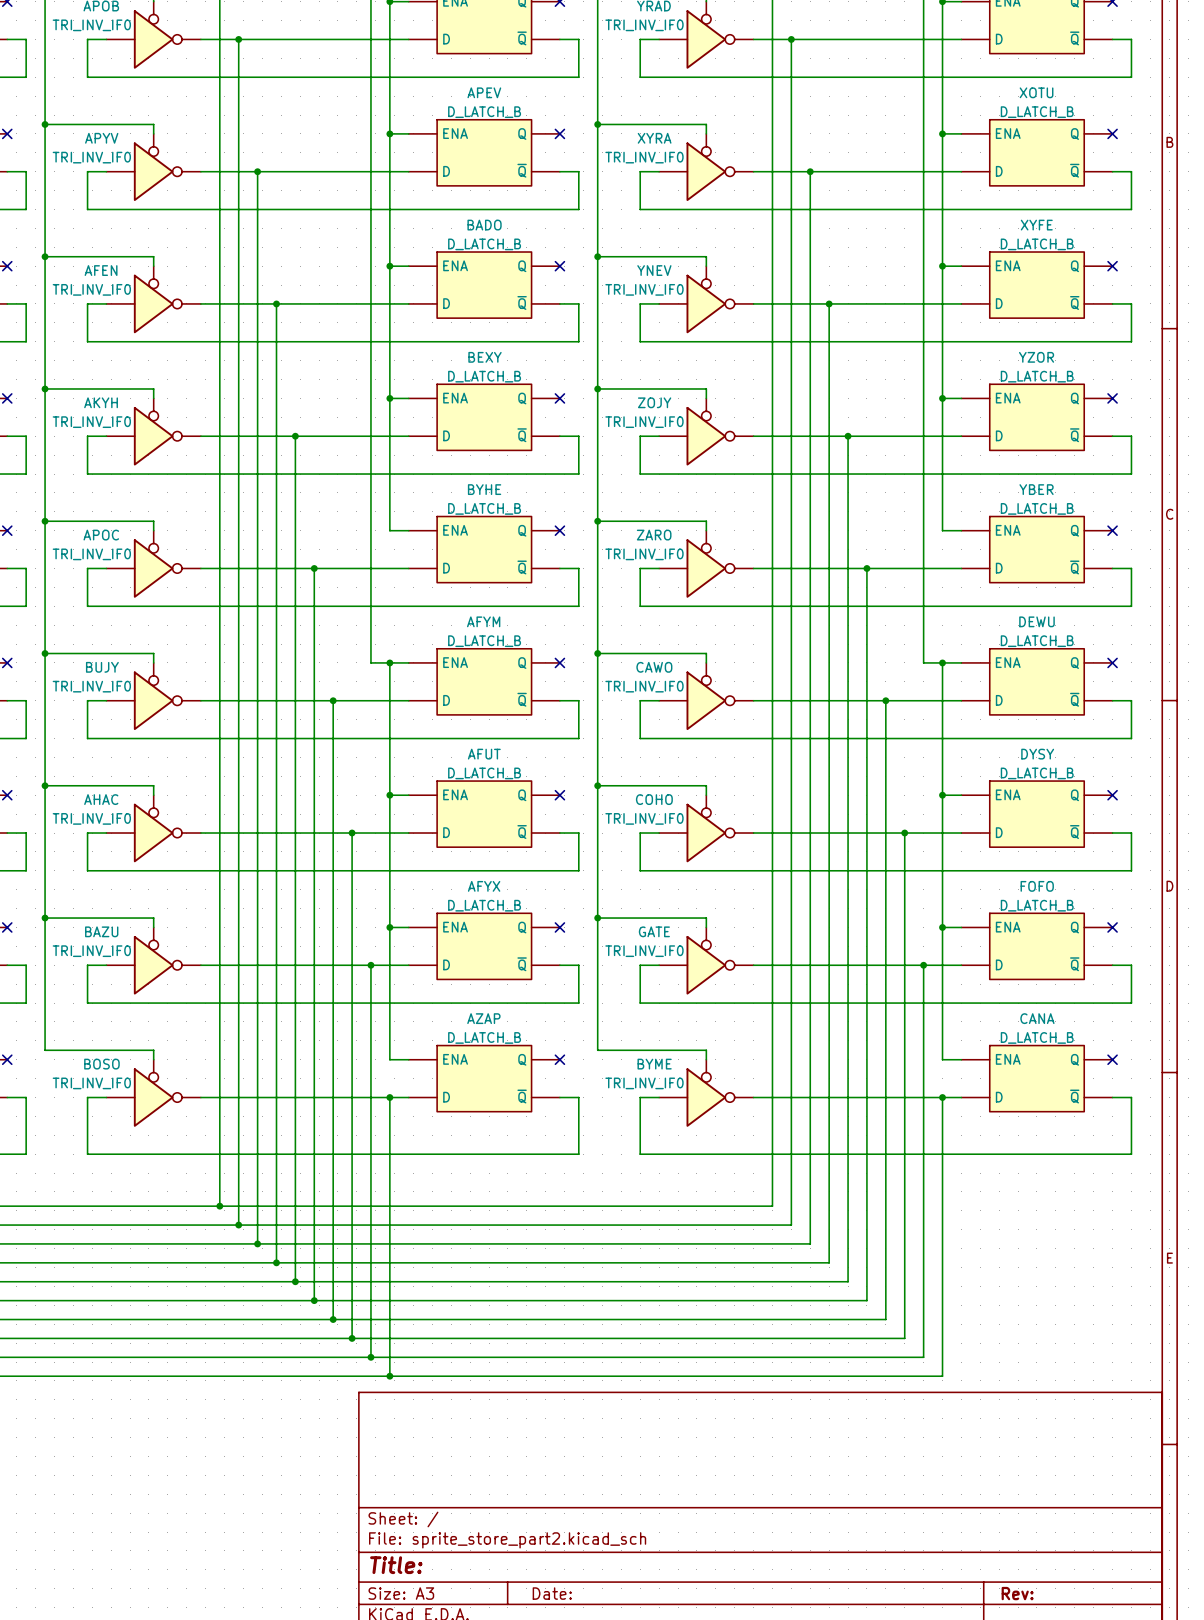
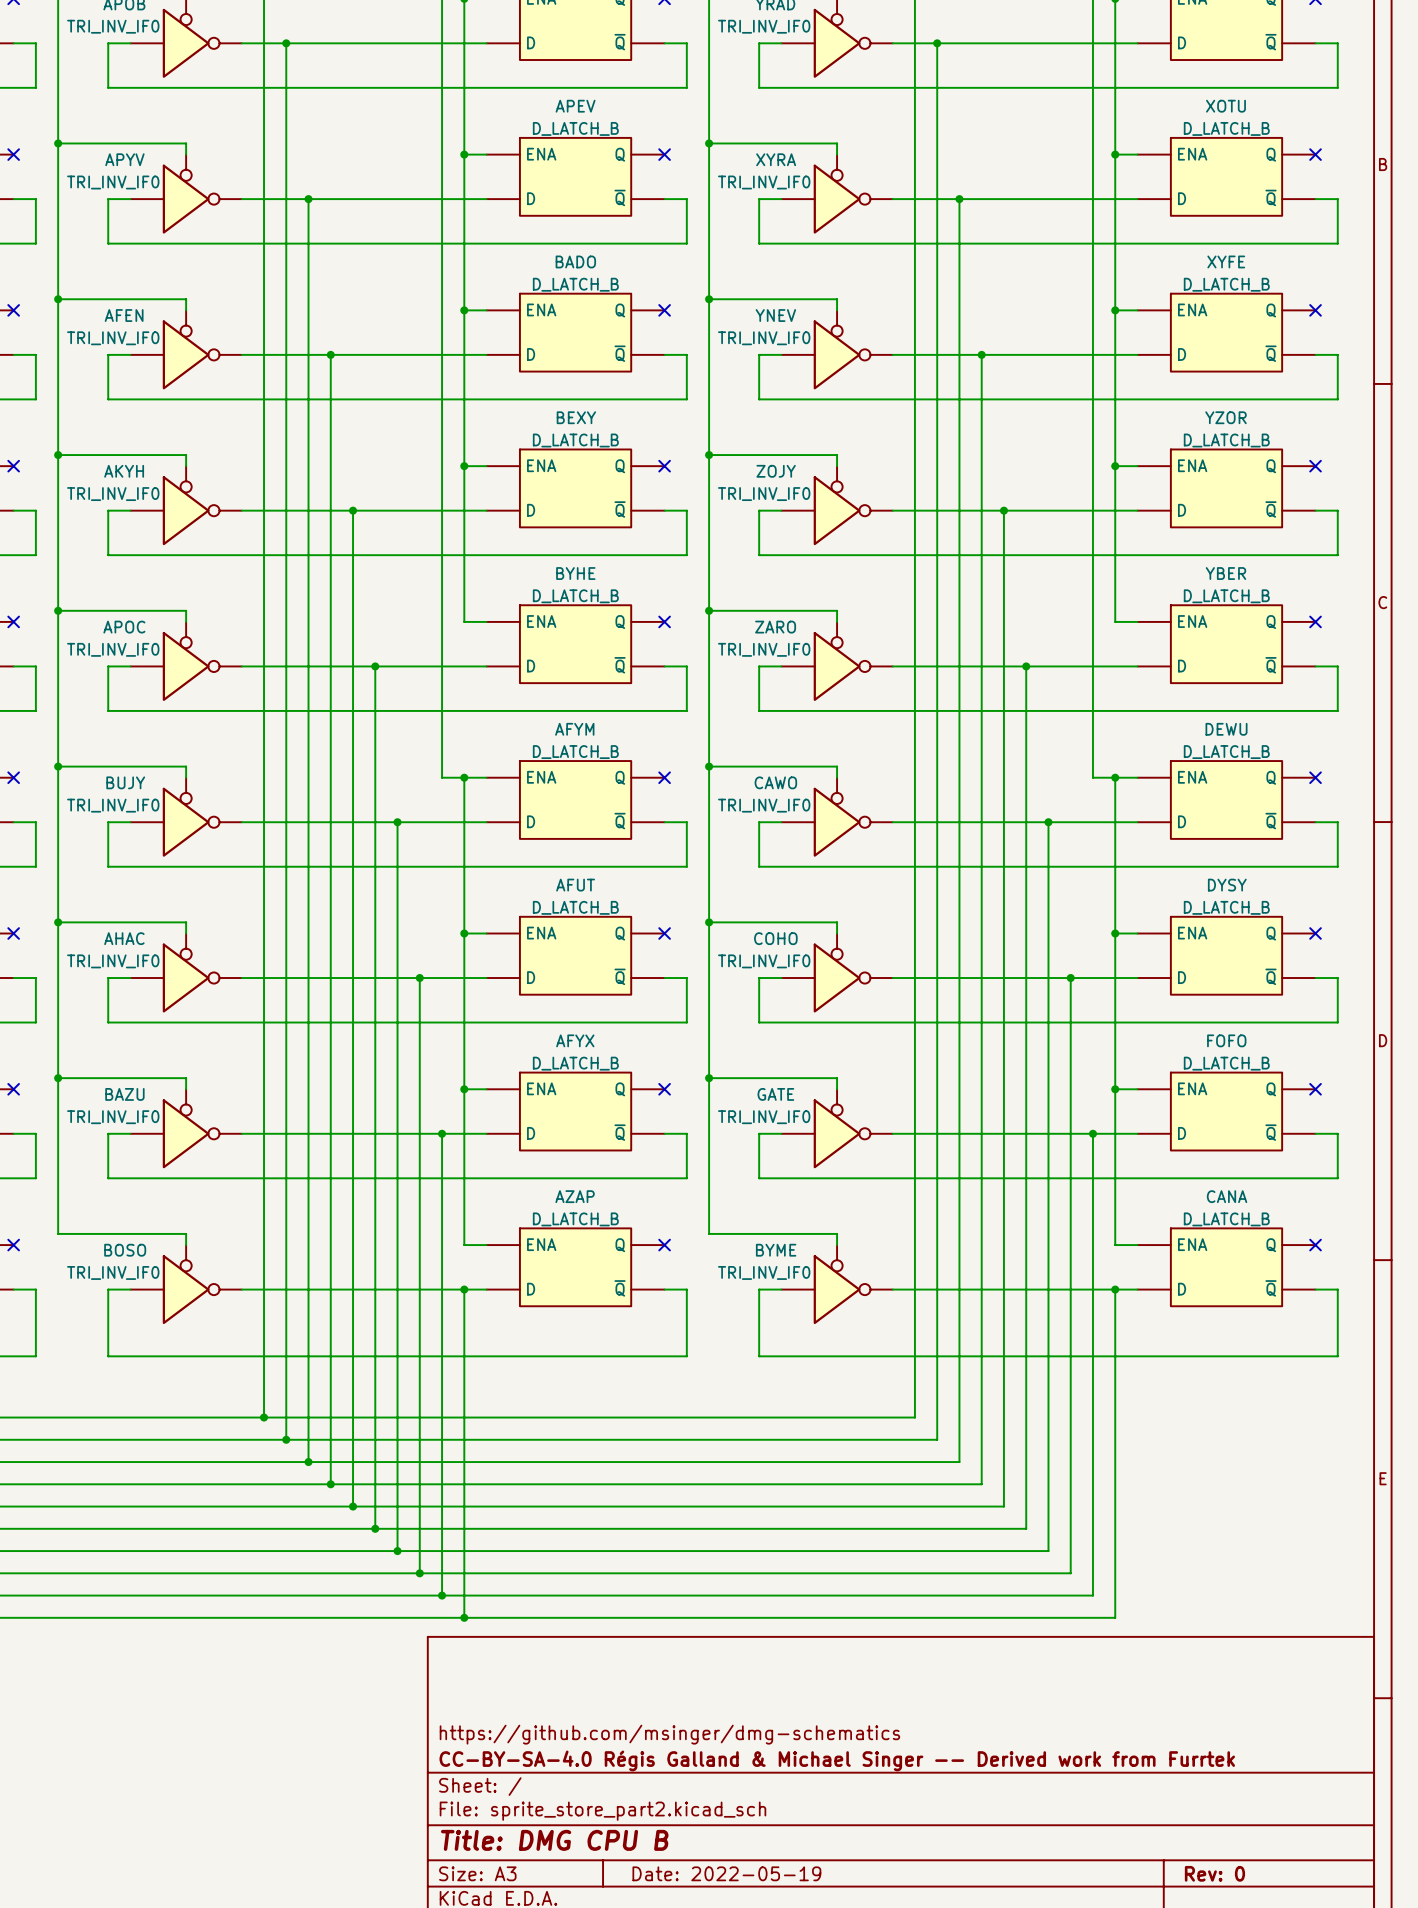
title block: none -> https://github.com/msinger/dmg-schematics (669, 1734)
title block: none -> CC-BY-SA-4.0 Régis Galland & Michael Singer -- Derived work from Furrtek (837, 1760)
title block: Title: (396, 1565) -> Title: DMG CPU B (554, 1840)
title block: Date: (552, 1593) -> Date: 2022-05-19 (726, 1873)
title block: Rev: (1017, 1593) -> Rev: 0 (1214, 1873)

